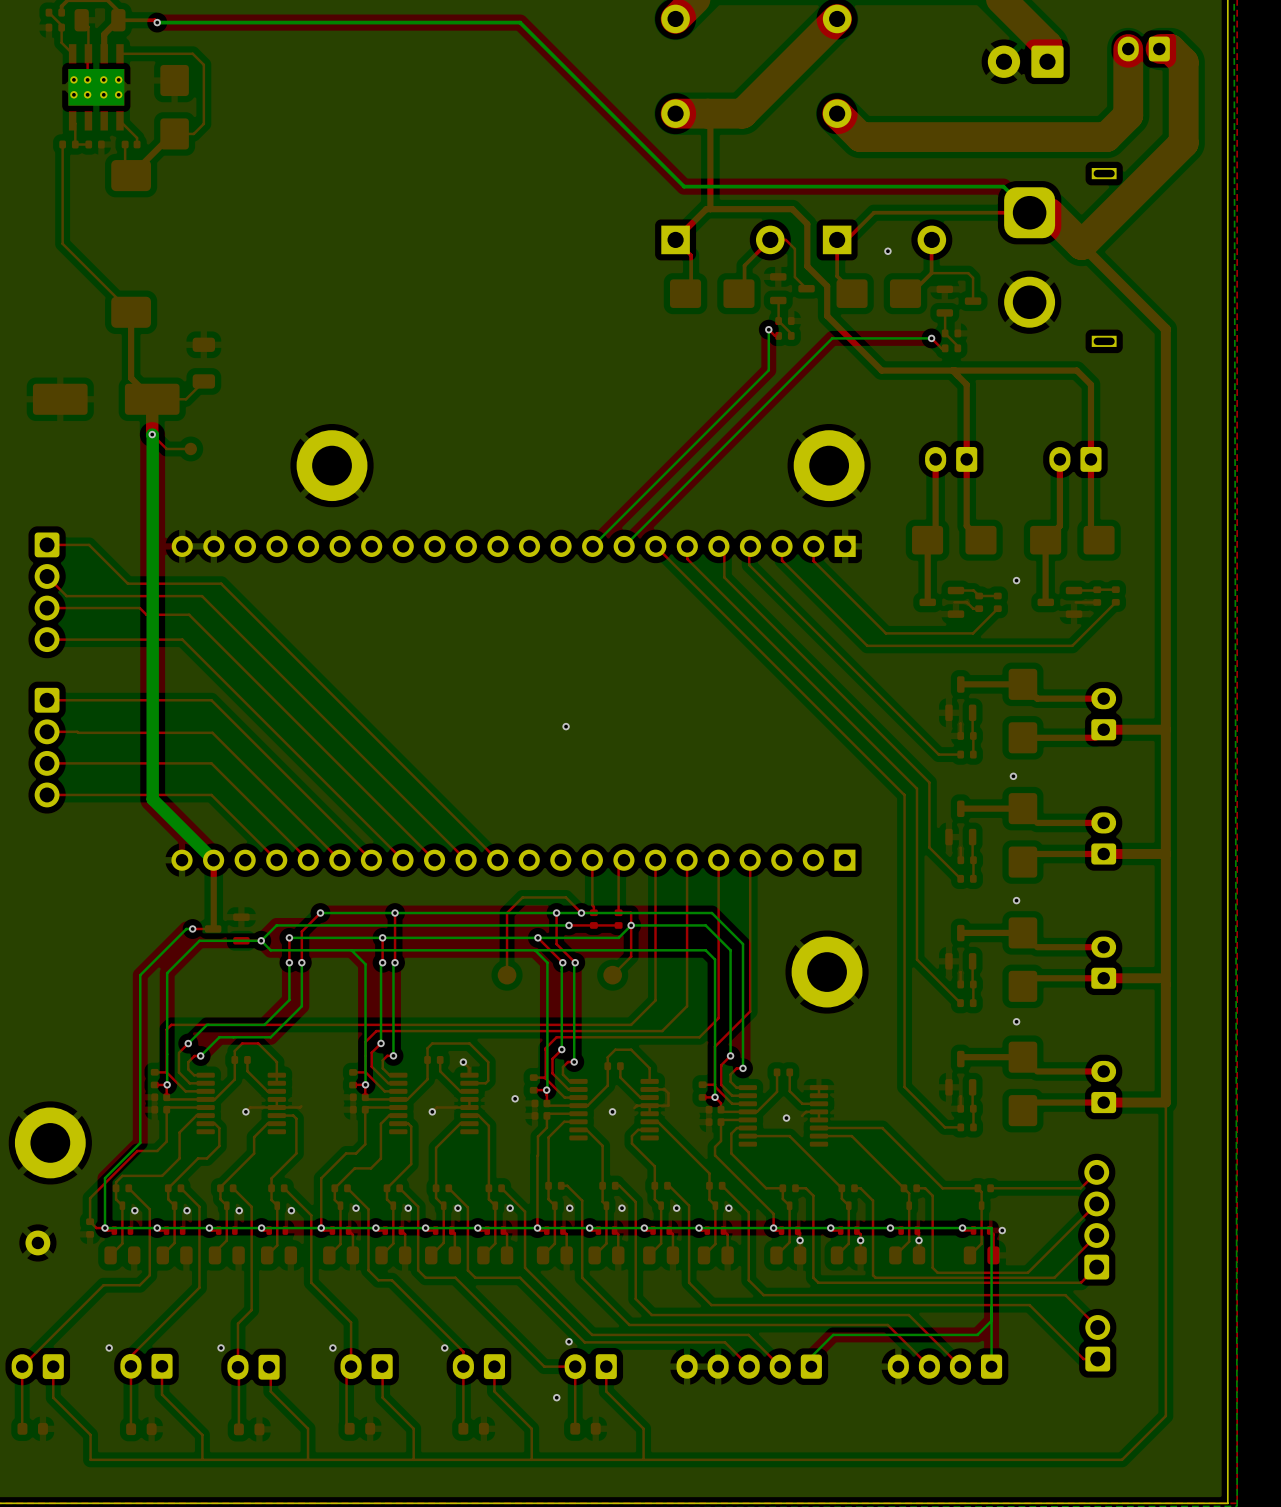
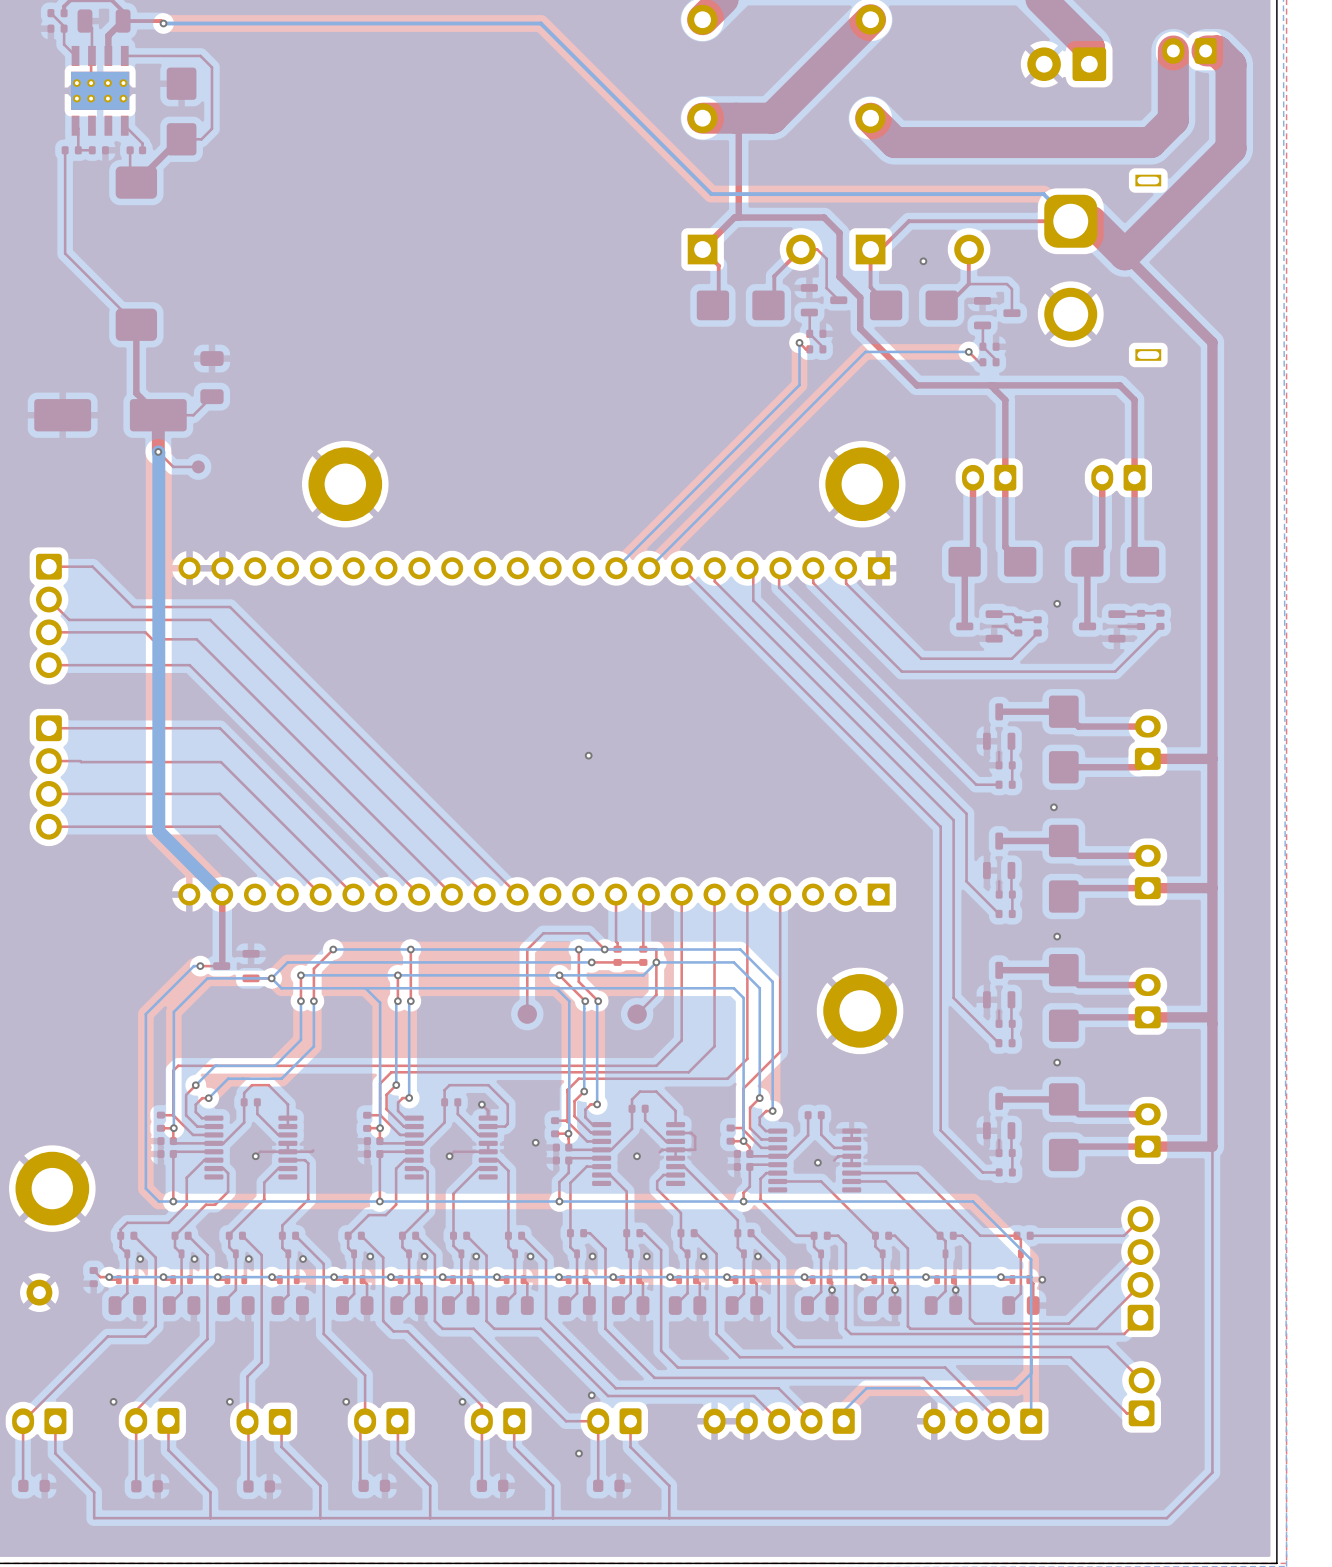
top track: (166, 1141) (157, 1151) (137, 1151) (90, 1198) (90, 1221) -> (173, 1187) (173, 1201)
bottom track: (140, 1142) (105, 1178) (105, 1228) -> (145, 1188) (158, 1201) (740, 1201)
top track: (365, 1144) (356, 1153) (346, 1153) (321, 1178) (321, 1228) -> (379, 1189) (379, 1201)
via: none -> (173, 1201)
via: none -> (379, 1201)
top track: (537, 1155) (537, 1228) -> none
via: none -> (559, 1201)
top track: (715, 1155) (773, 1213) (773, 1228) -> none
bottom track: none -> (743, 1201) (973, 1201) (1031, 1259) (1031, 1277)
via: none -> (743, 1201)

